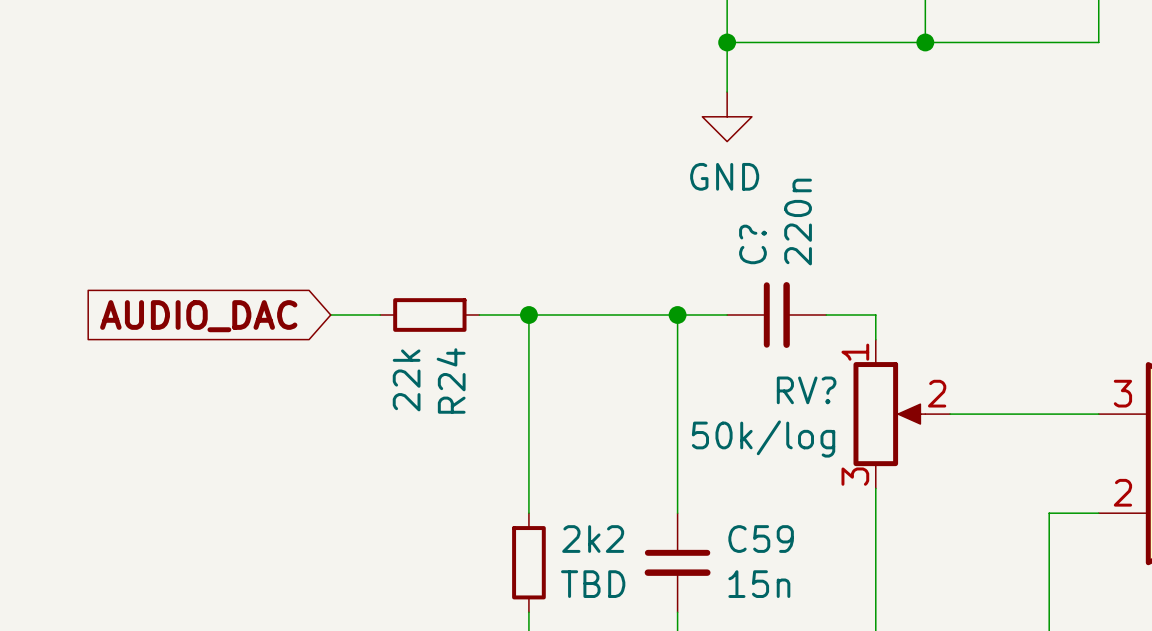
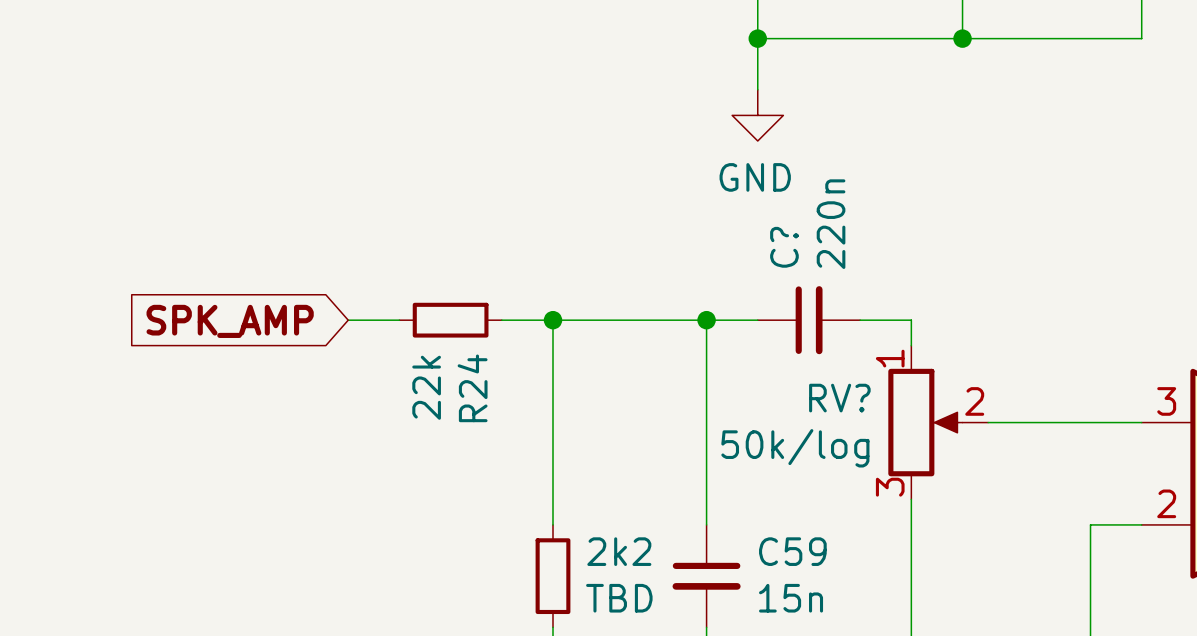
global label: AUDIO_DAC (198, 316) -> SPK_AMP (230, 321)

